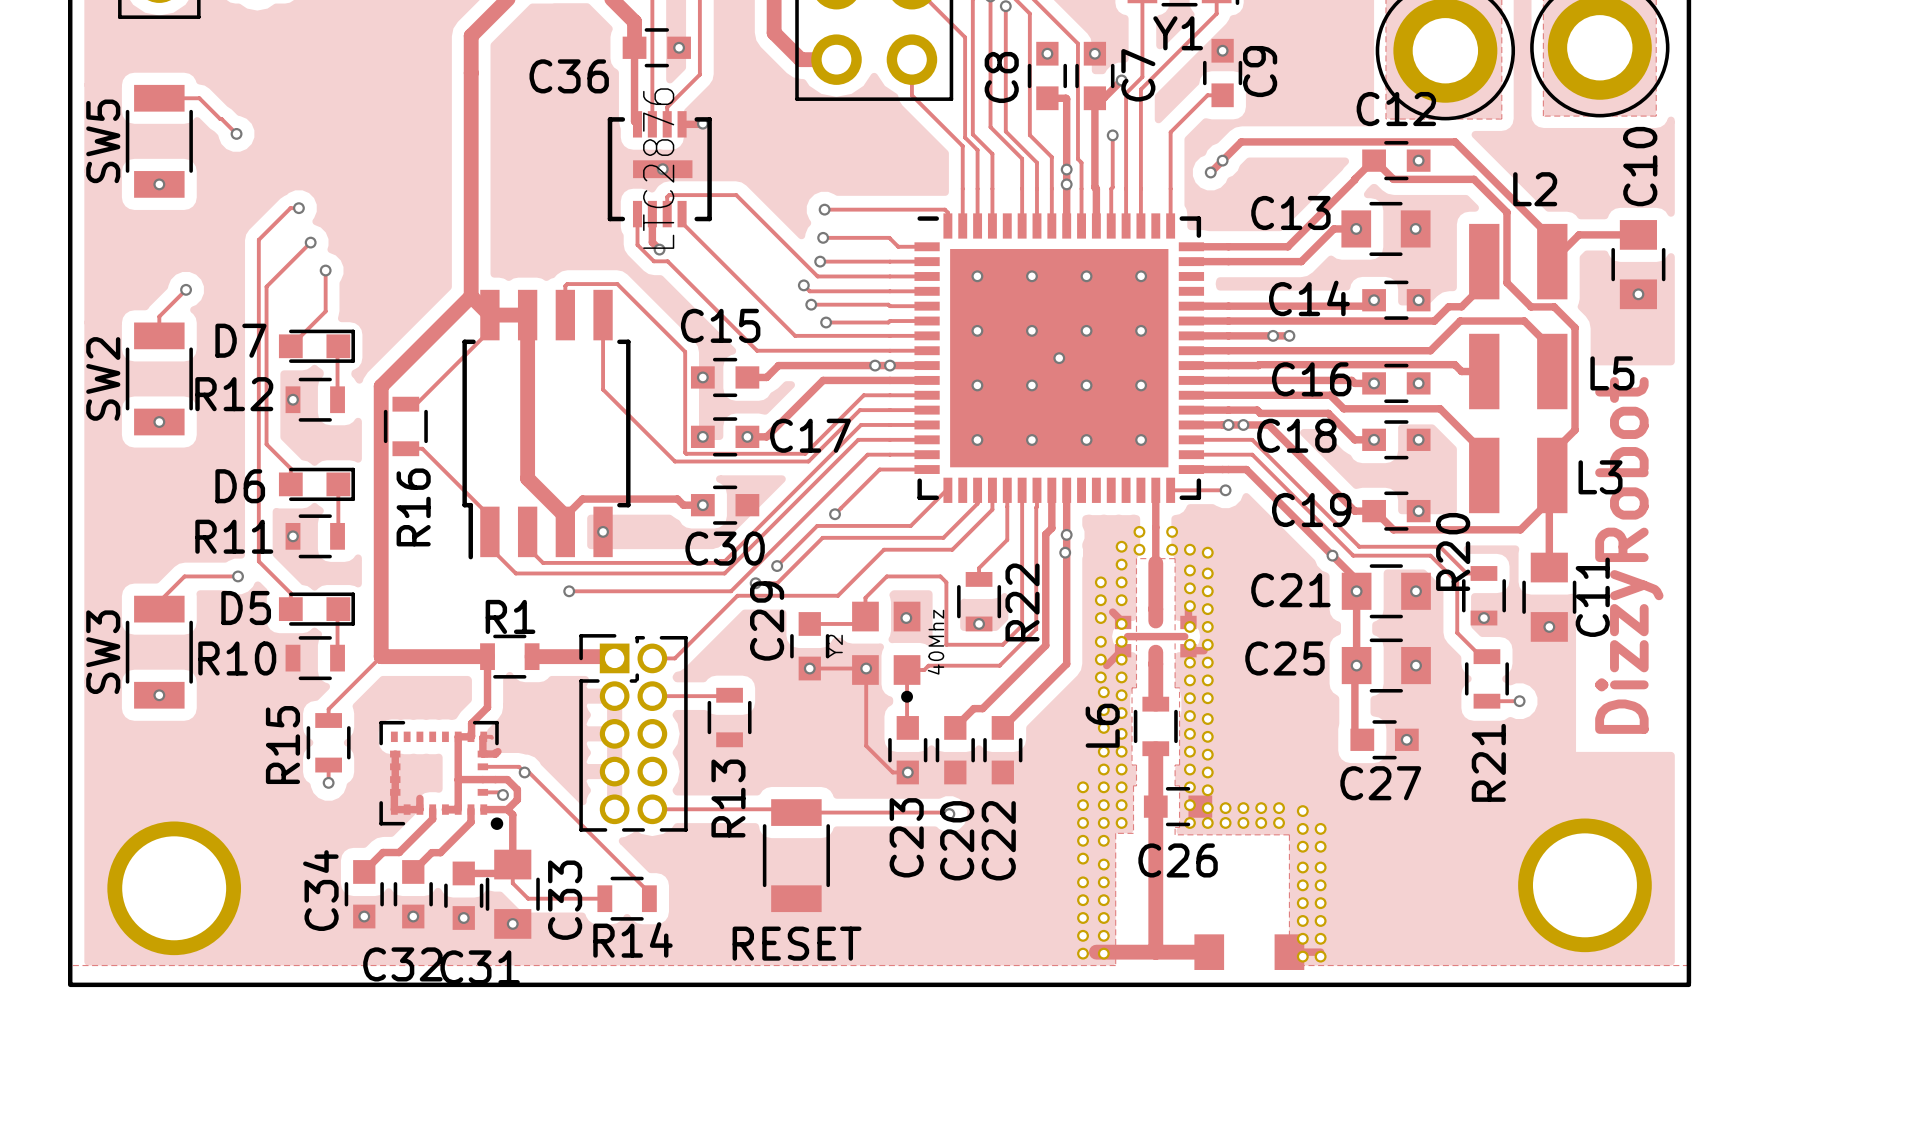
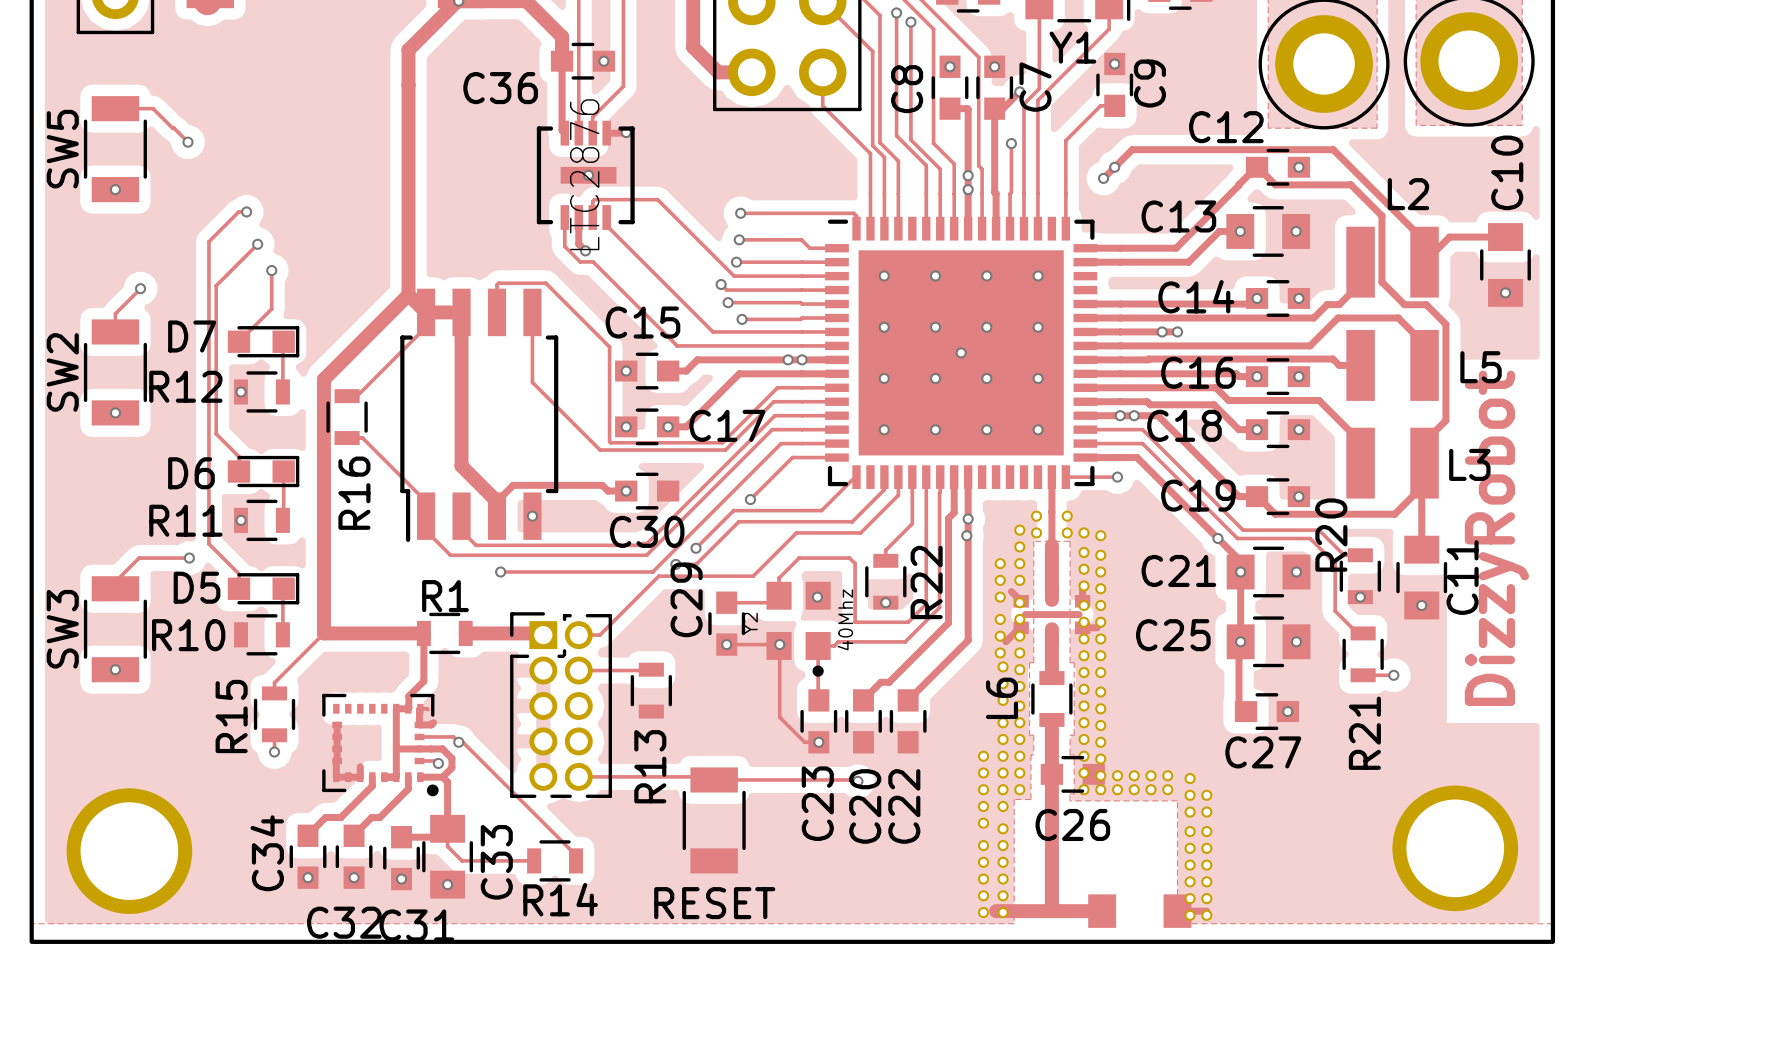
C12 name position: C12 (1396, 109) -> C12 (1226, 127)

